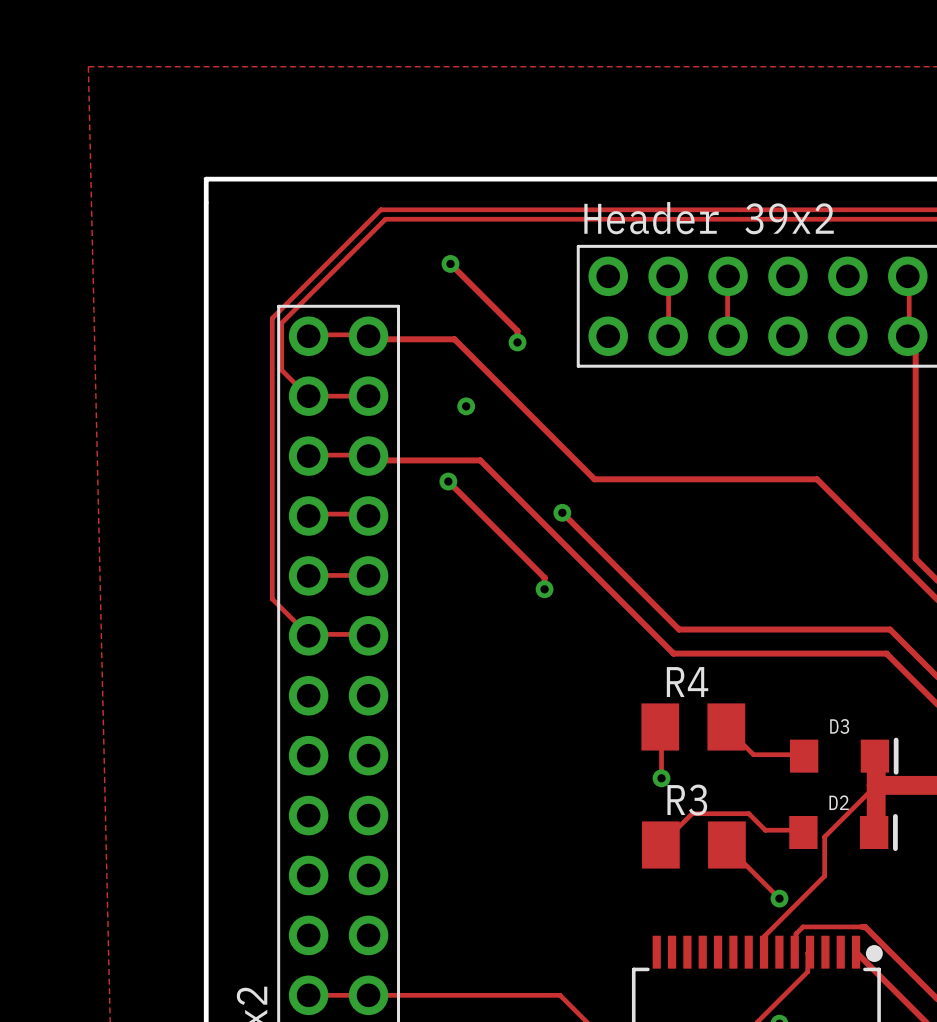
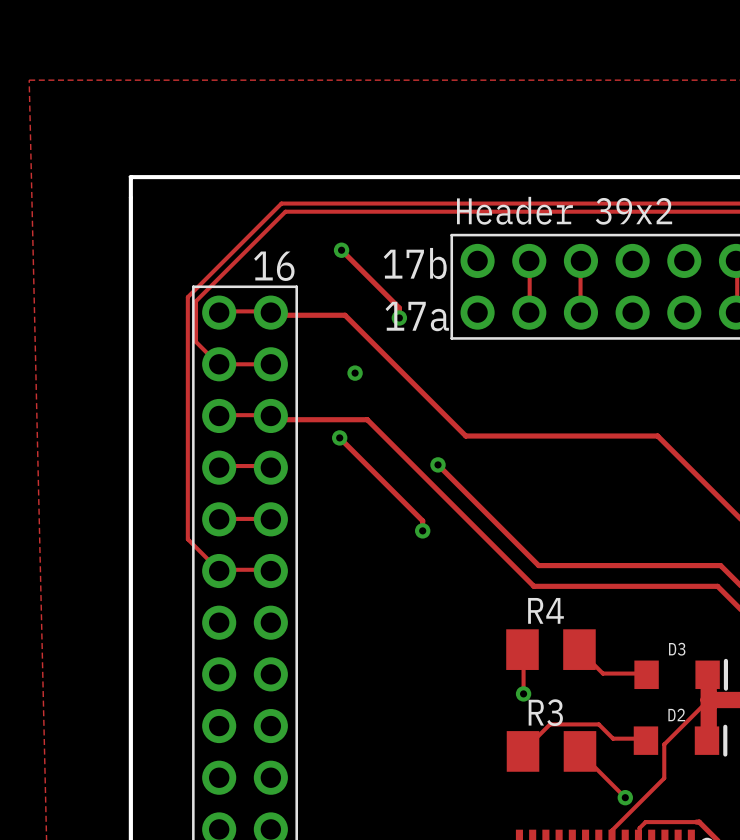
text: none -> 17b (415, 263)
text: none -> 16 (274, 266)
text: none -> 17a (417, 316)

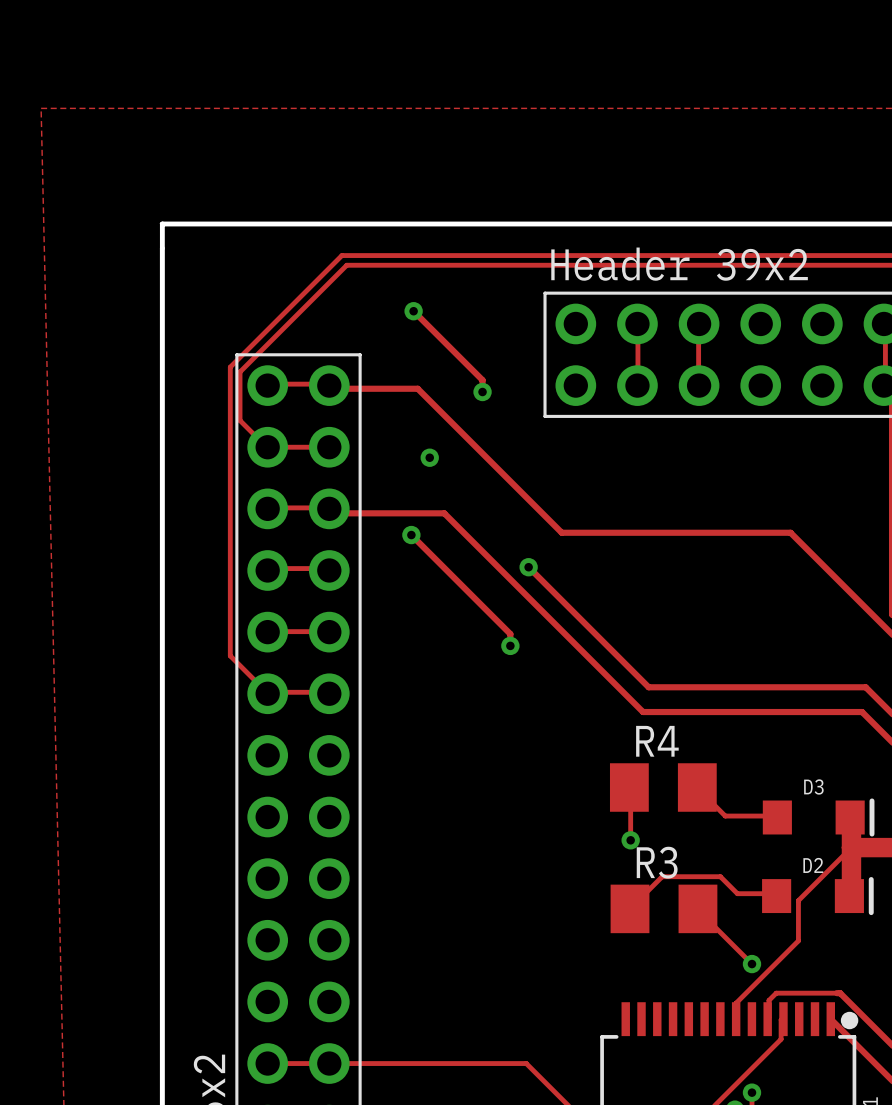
text: 17b (415, 263) -> none
text: 16 (274, 266) -> none
text: 17a (417, 316) -> none

